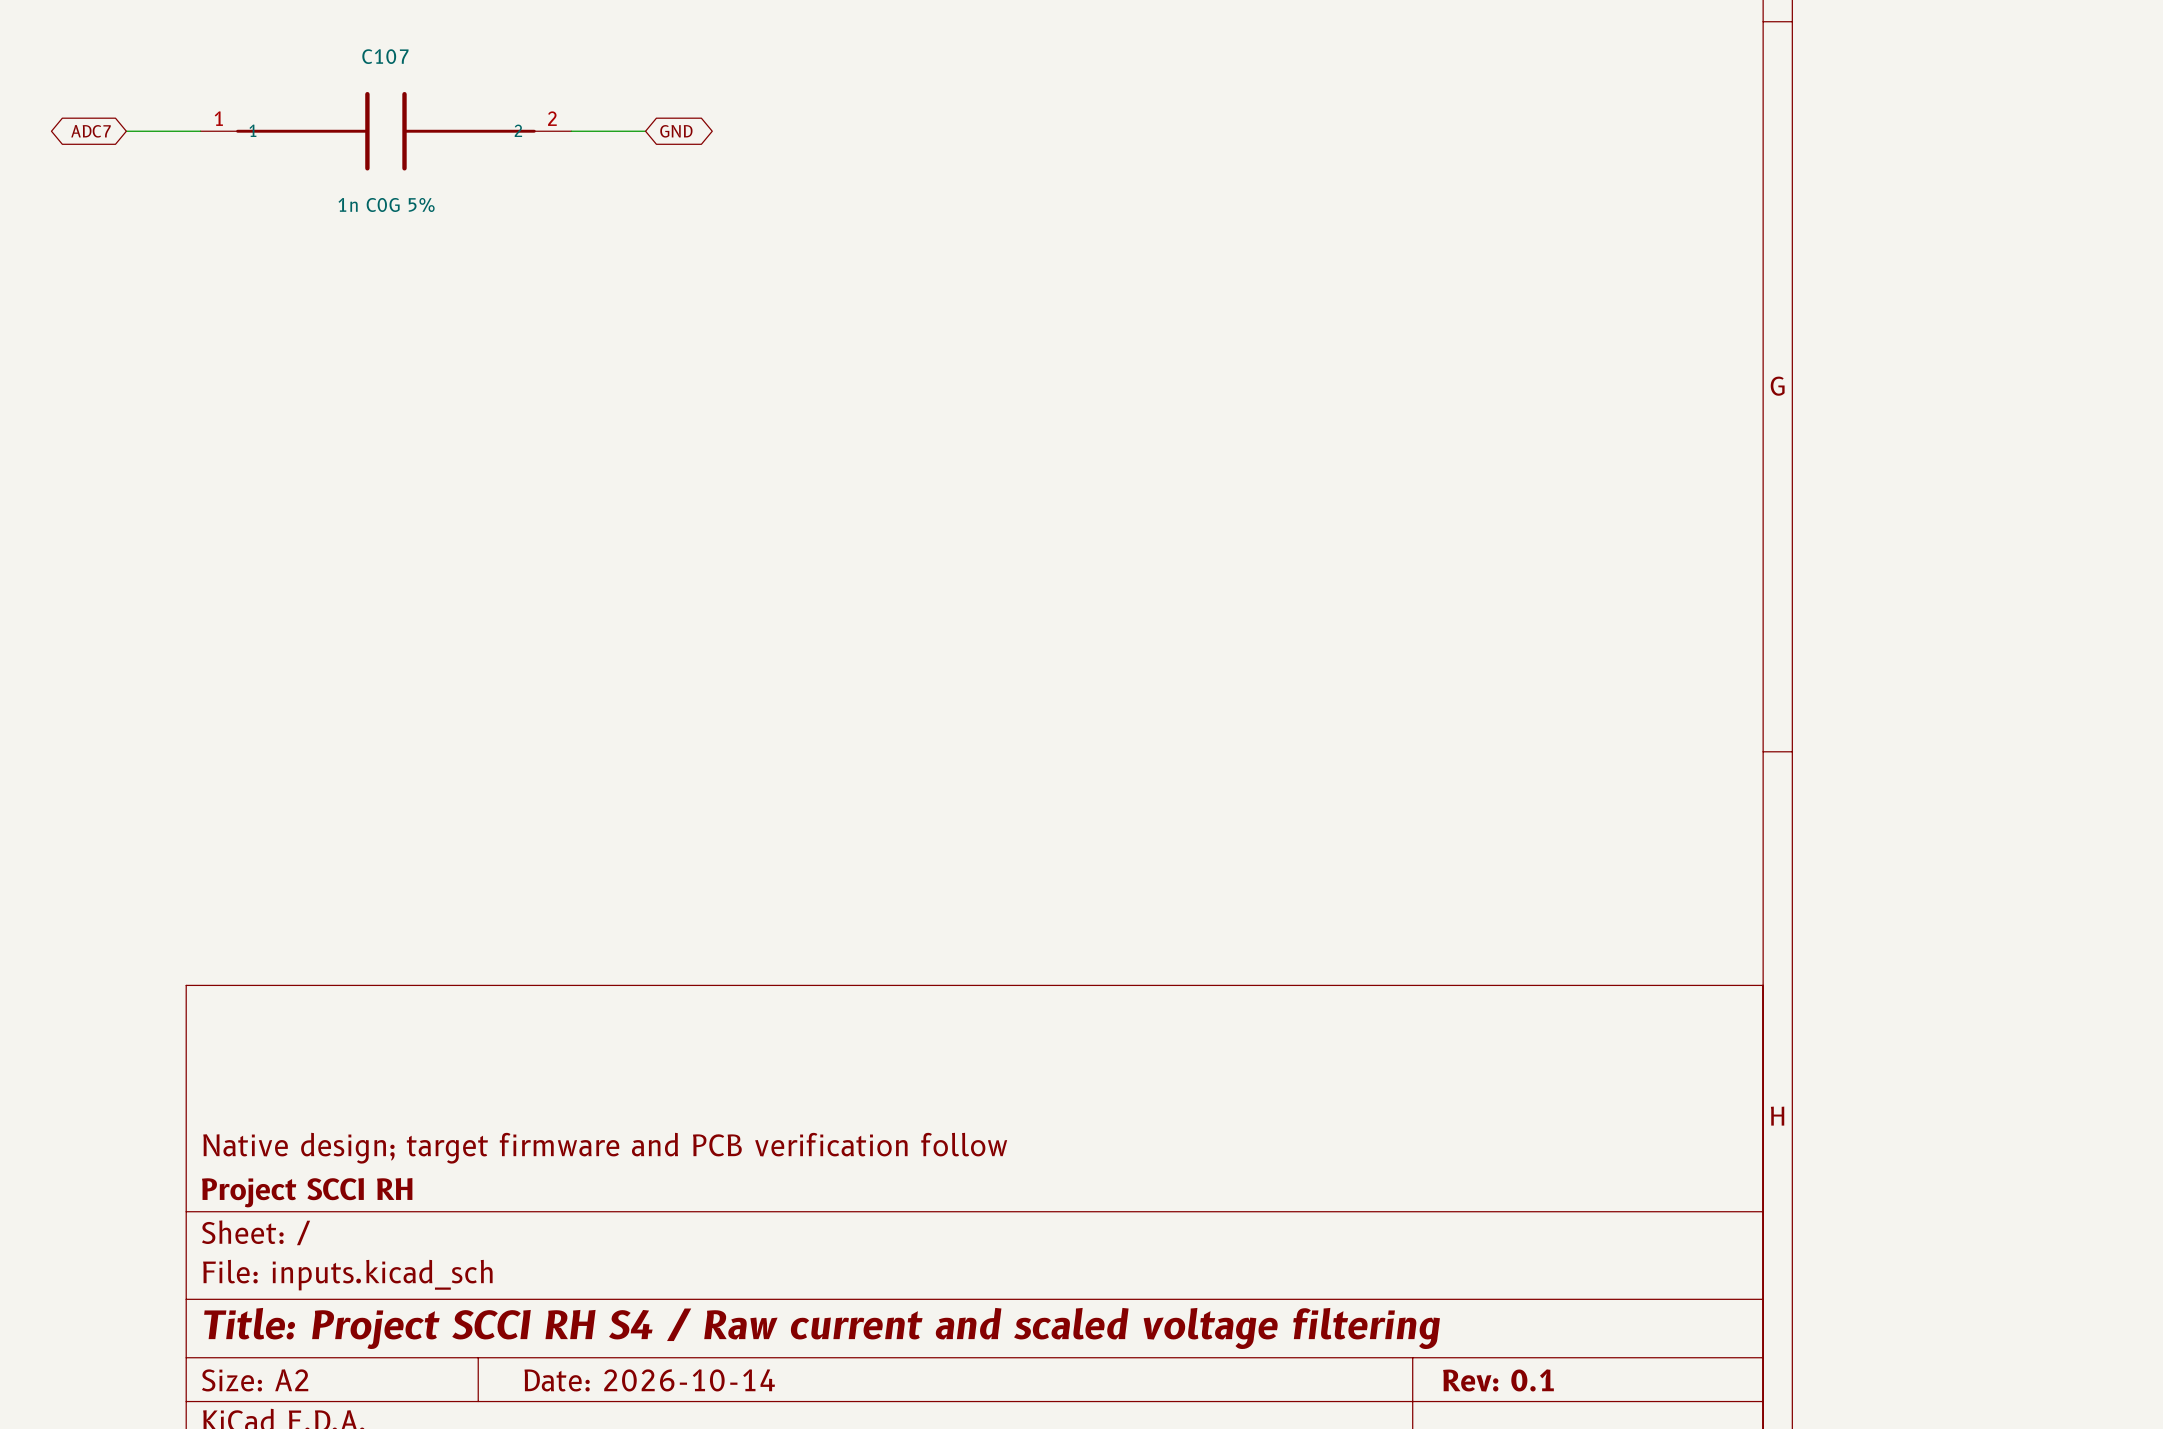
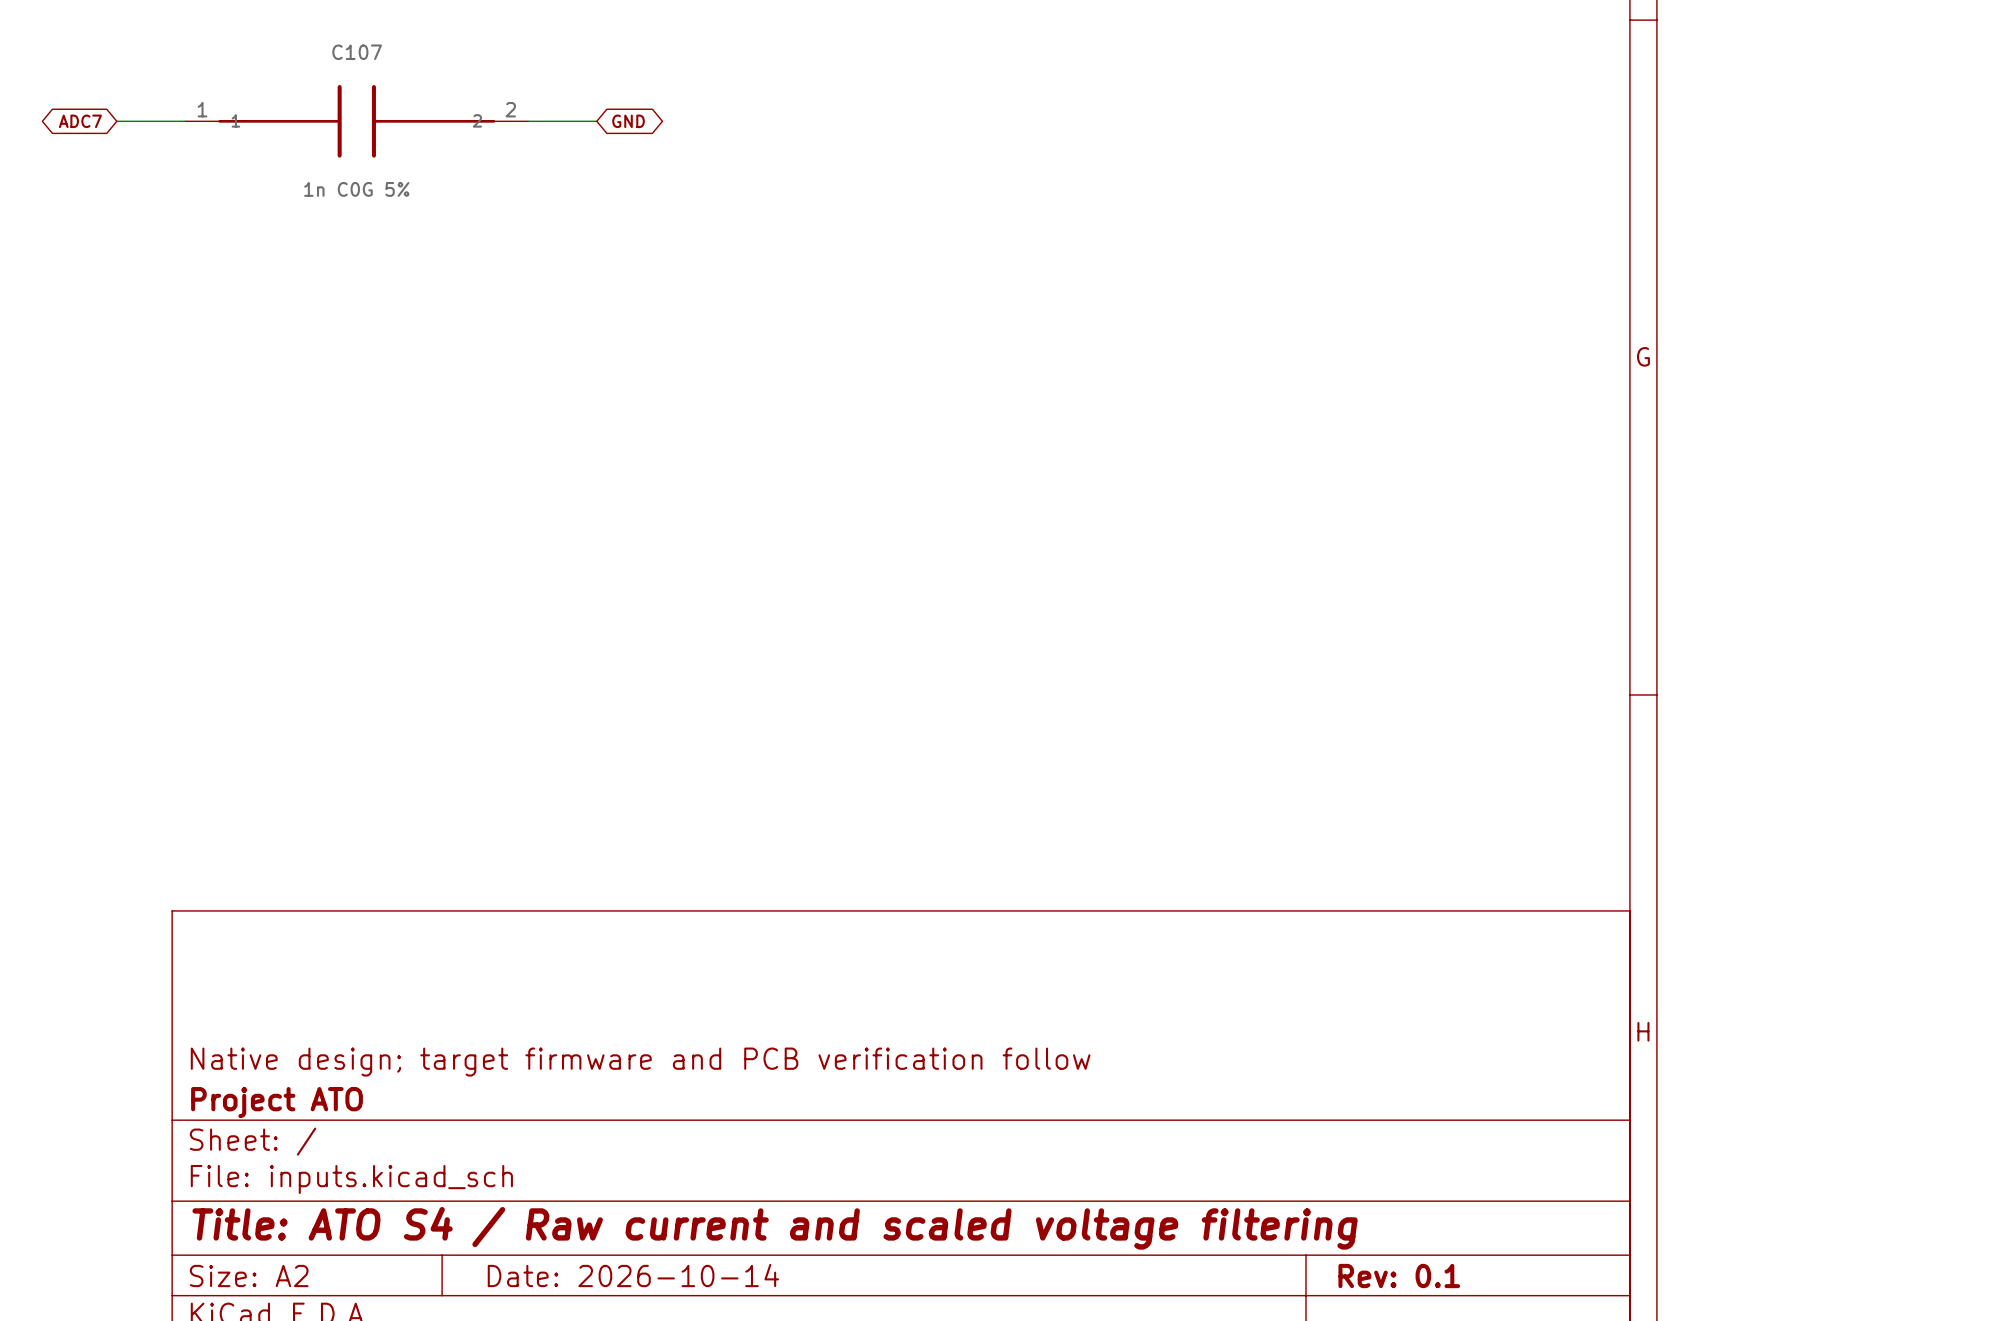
title block: Project SCCI RH (307, 1192) -> Project ATO (277, 1102)
title block: Title: Project SCCI RH S4 / Raw current and scaled voltage filtering (822, 1328) -> Title: ATO S4 / Raw current and scaled voltage filtering (774, 1228)

